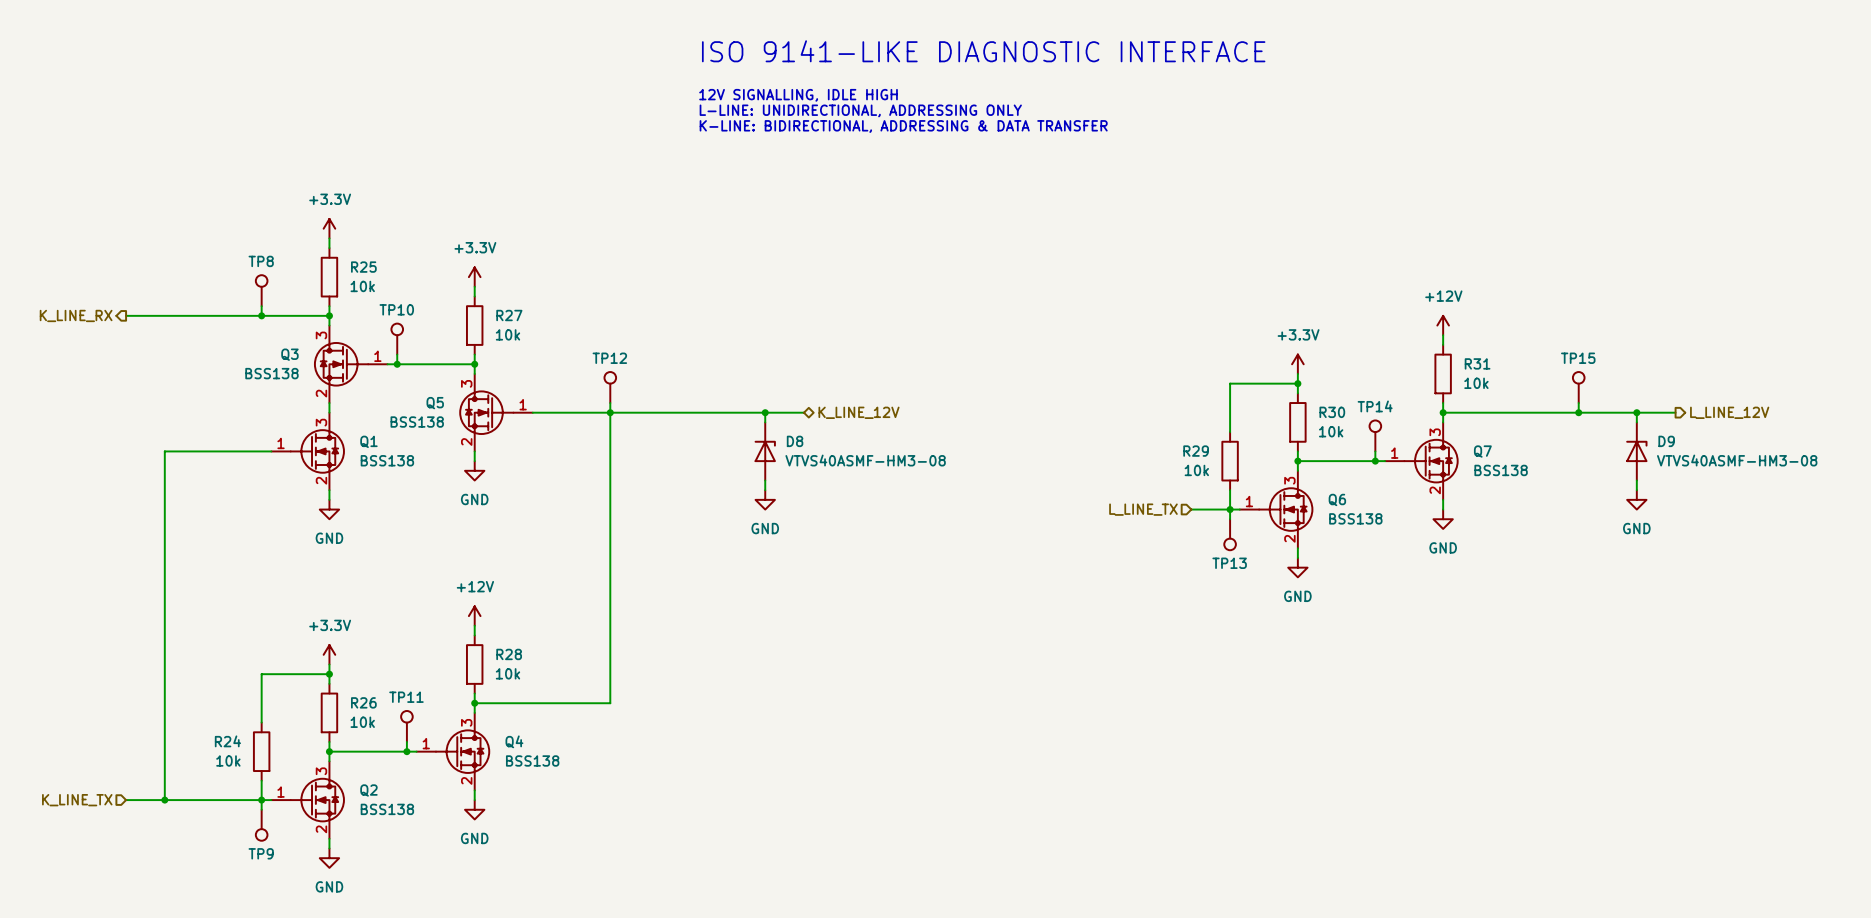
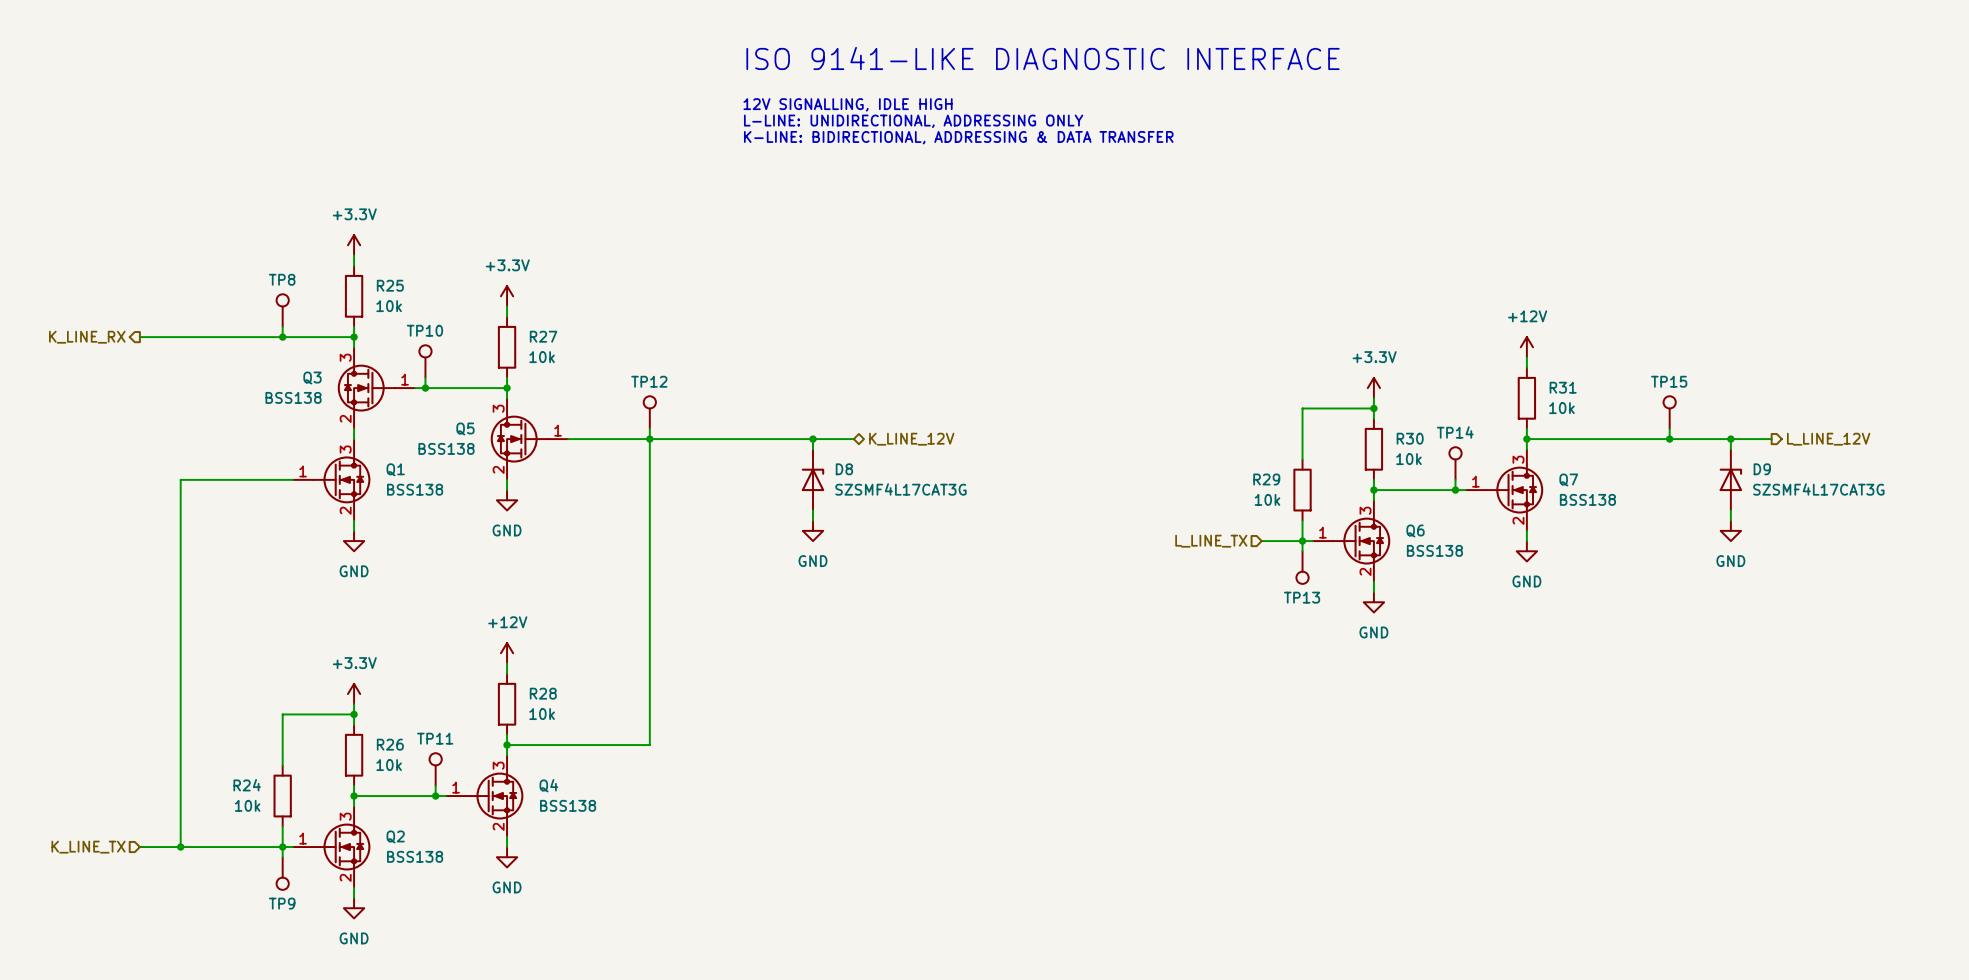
D8 value: VTVS40ASMF-HM3-08 (865, 460) -> SZSMF4L17CAT3G (900, 489)
D9 value: VTVS40ASMF-HM3-08 (1737, 460) -> SZSMF4L17CAT3G (1818, 489)

